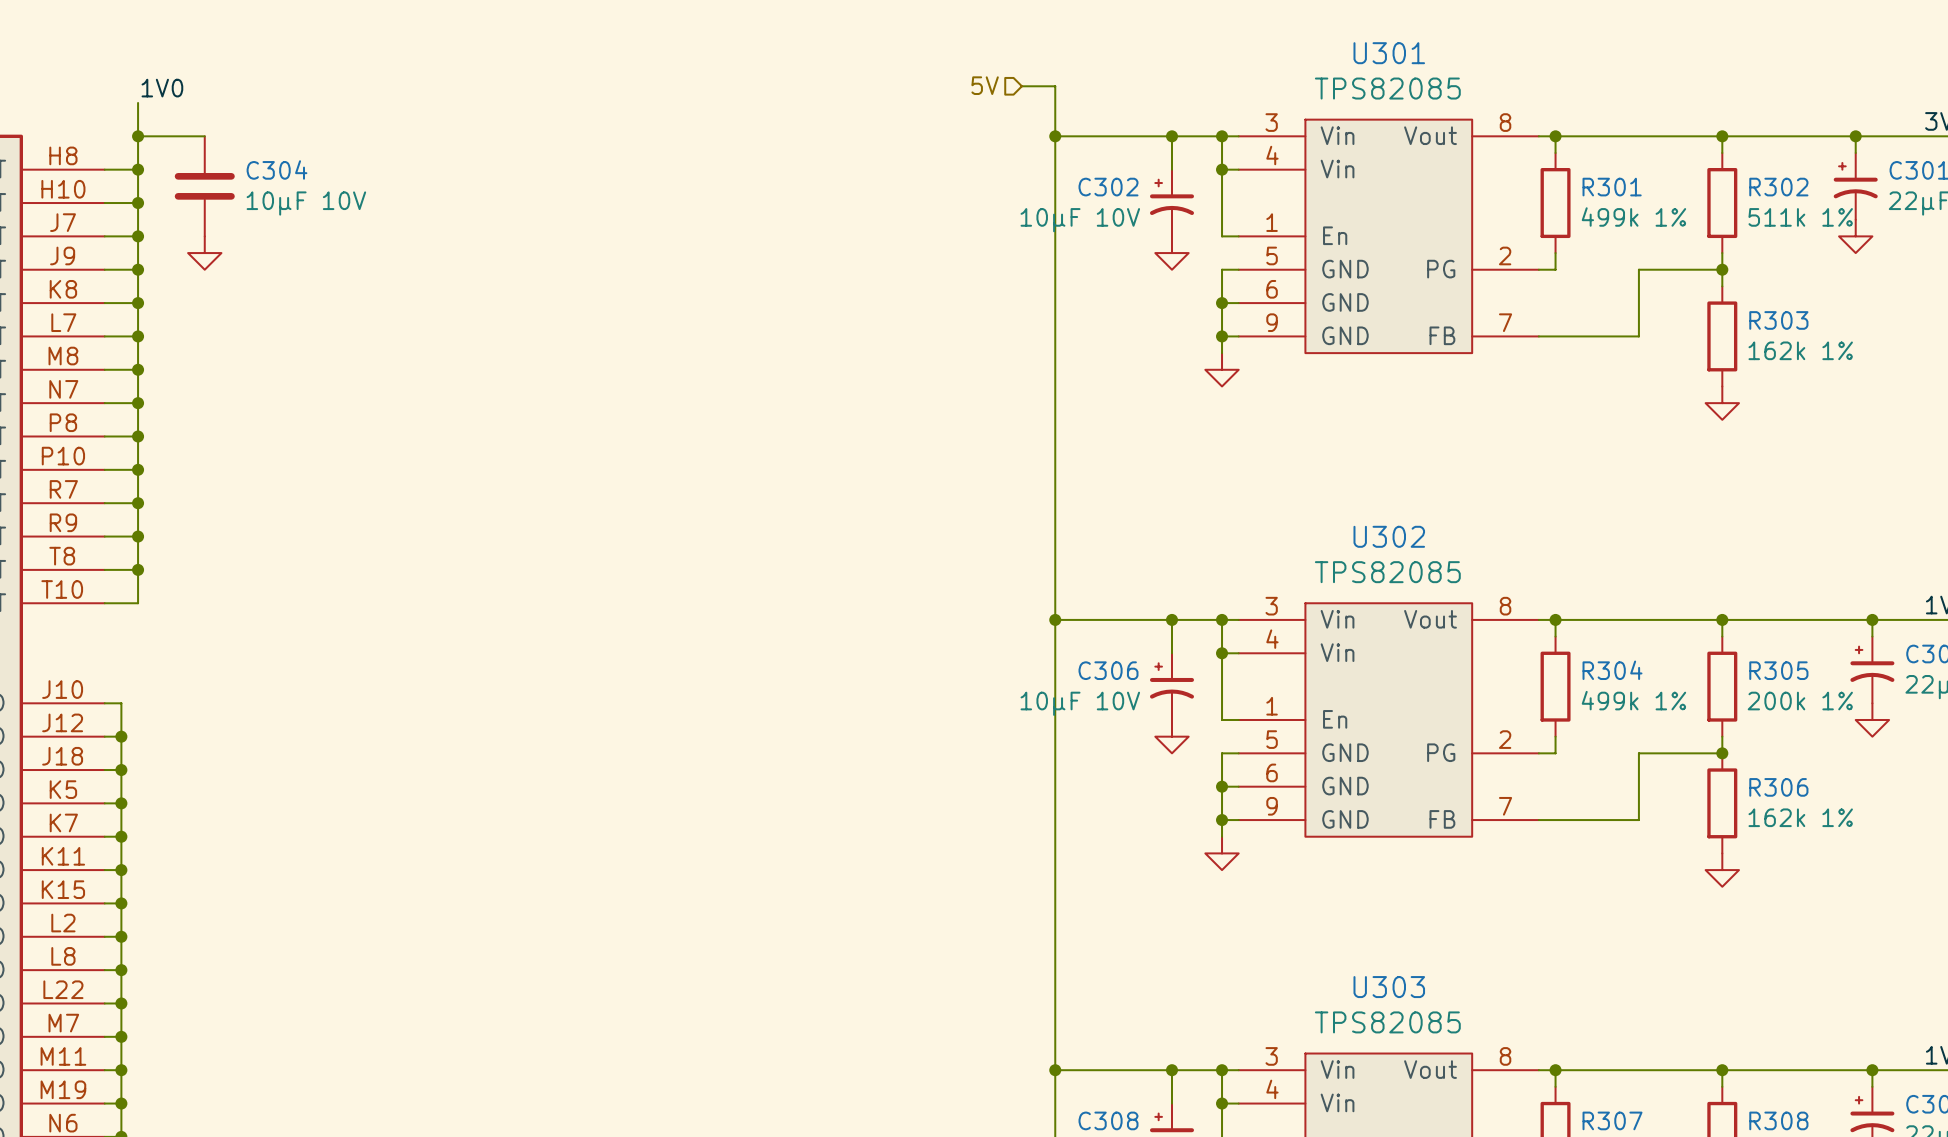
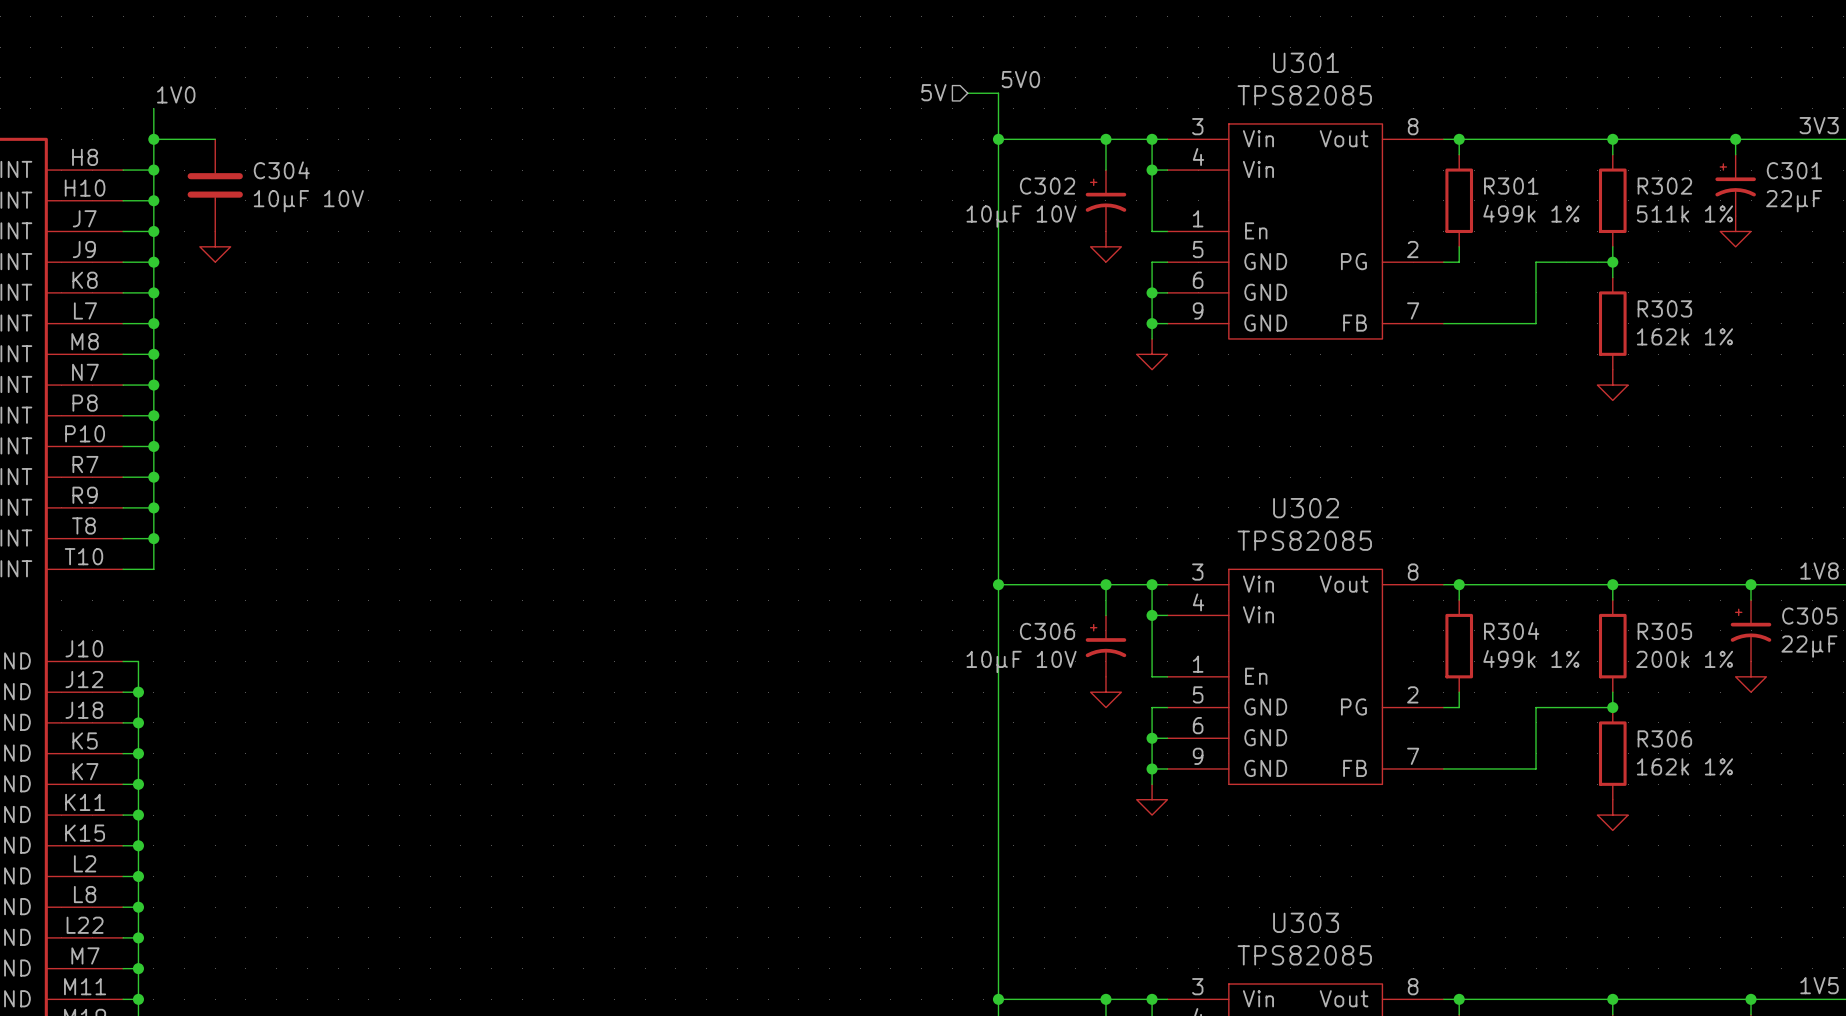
label: none -> 5V0 (1020, 79)

